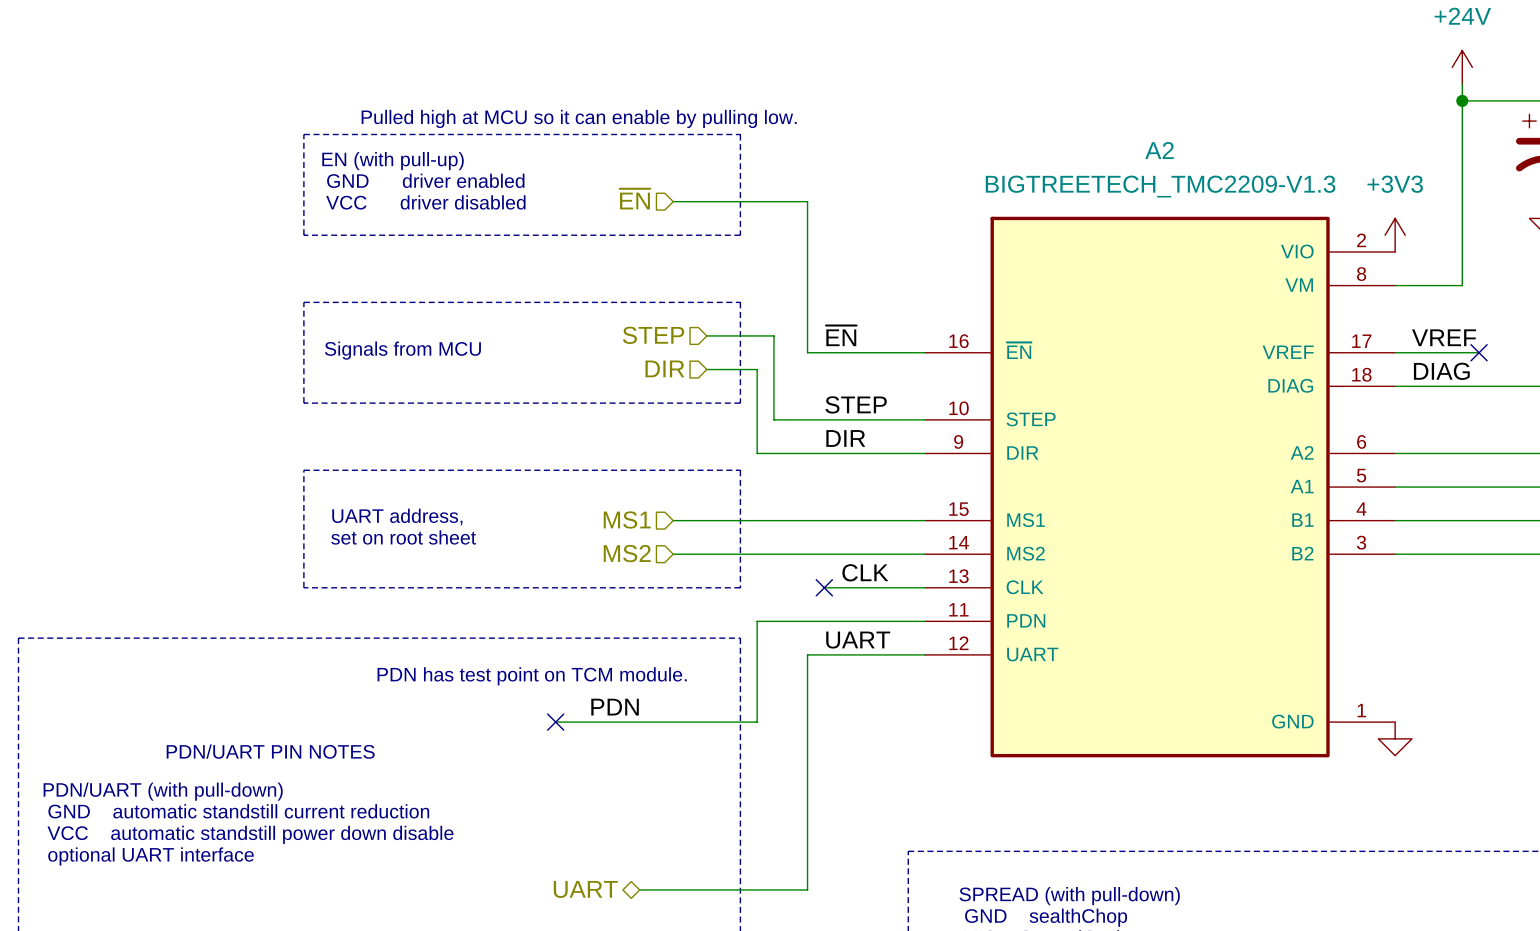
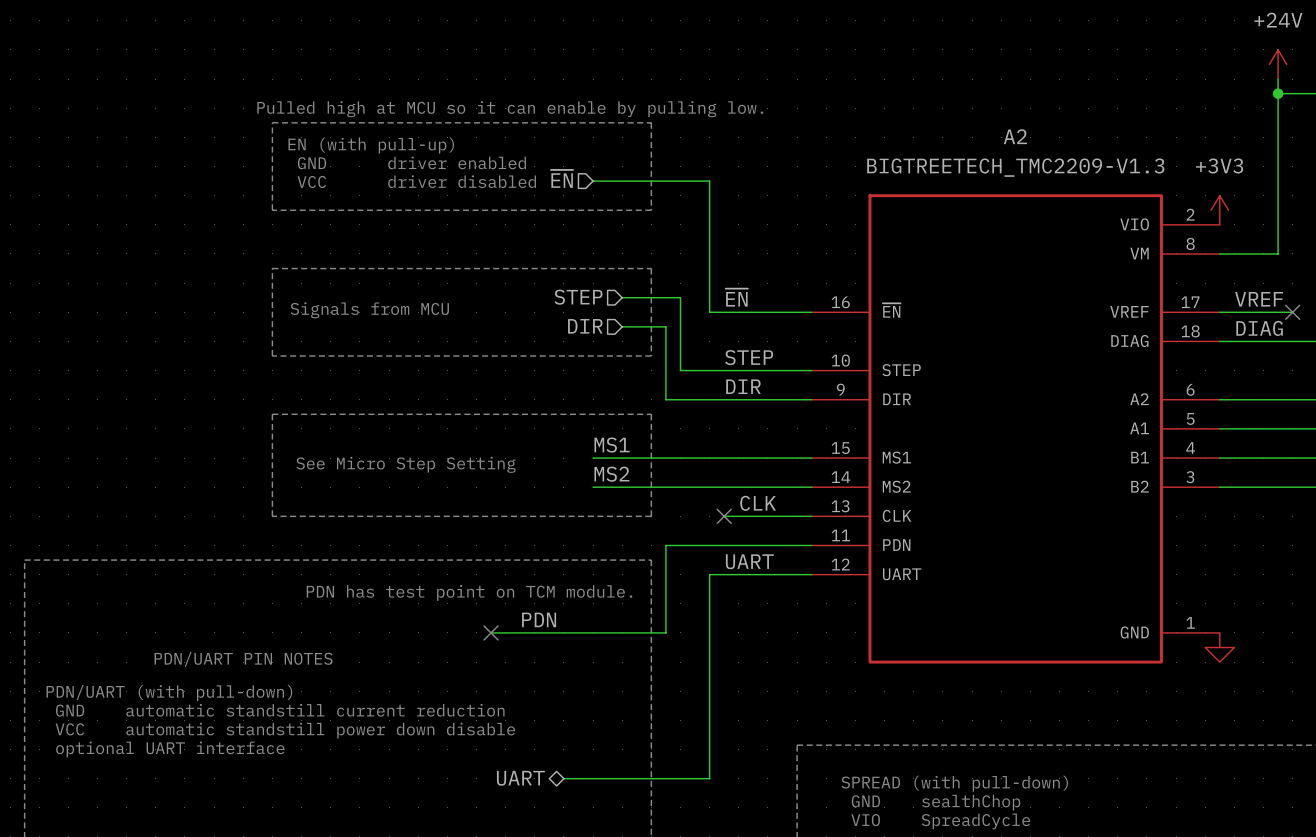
label: none -> MS1 (612, 445)
text: UART address, (397, 516) -> none
hierarchical label: MS1 (627, 519) -> none
text: none -> See Micro Step Setting (406, 464)
text: set on root sheet (403, 537) -> none
label: none -> MS2 (611, 474)
hierarchical label: MS2 (627, 553) -> none

